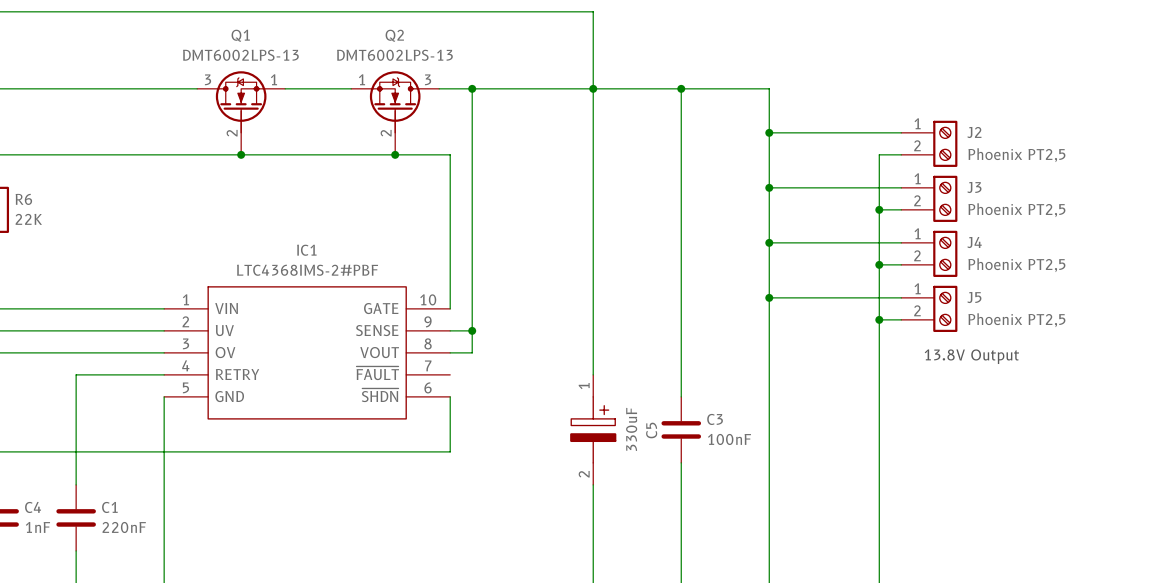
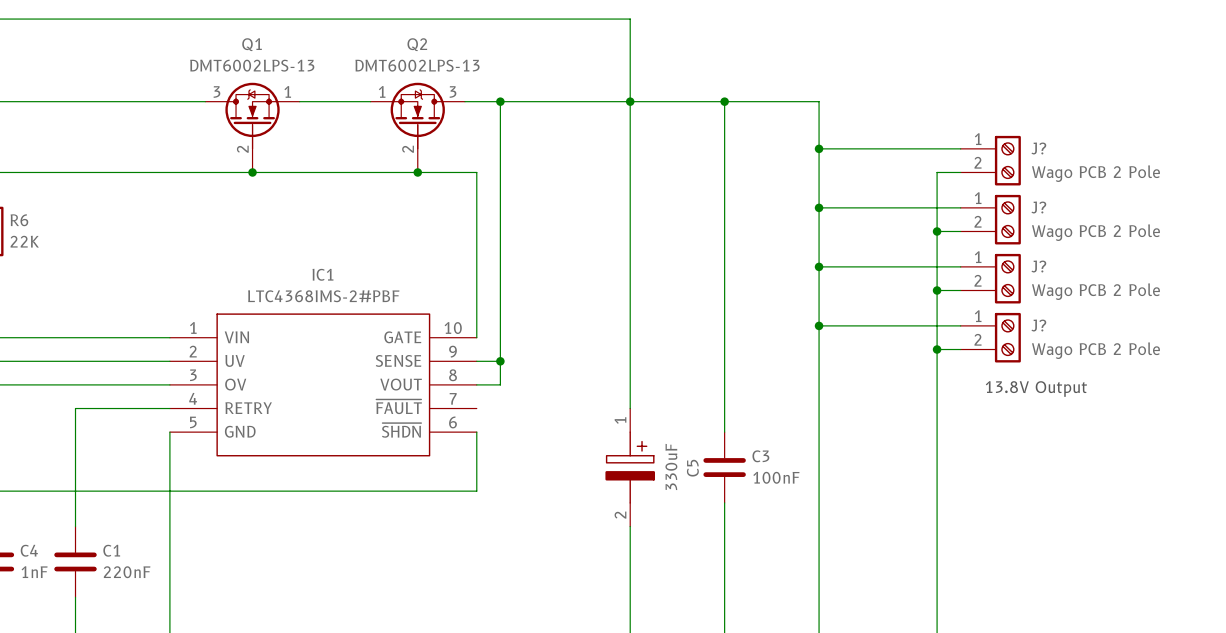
J2 name: J2 (974, 132) -> J? (1038, 148)
J2 value: Phoenix PT2,5 (1016, 155) -> Wago PCB 2 Pole (1095, 173)
J3 name: J3 (974, 187) -> J? (1038, 207)
J3 value: Phoenix PT2,5 (1016, 210) -> Wago PCB 2 Pole (1095, 232)
J4 name: J4 (974, 242) -> J? (1038, 266)
J4 value: Phoenix PT2,5 (1016, 265) -> Wago PCB 2 Pole (1095, 291)
J5 name: J5 (974, 297) -> J? (1038, 325)
J5 value: Phoenix PT2,5 (1016, 320) -> Wago PCB 2 Pole (1095, 350)

